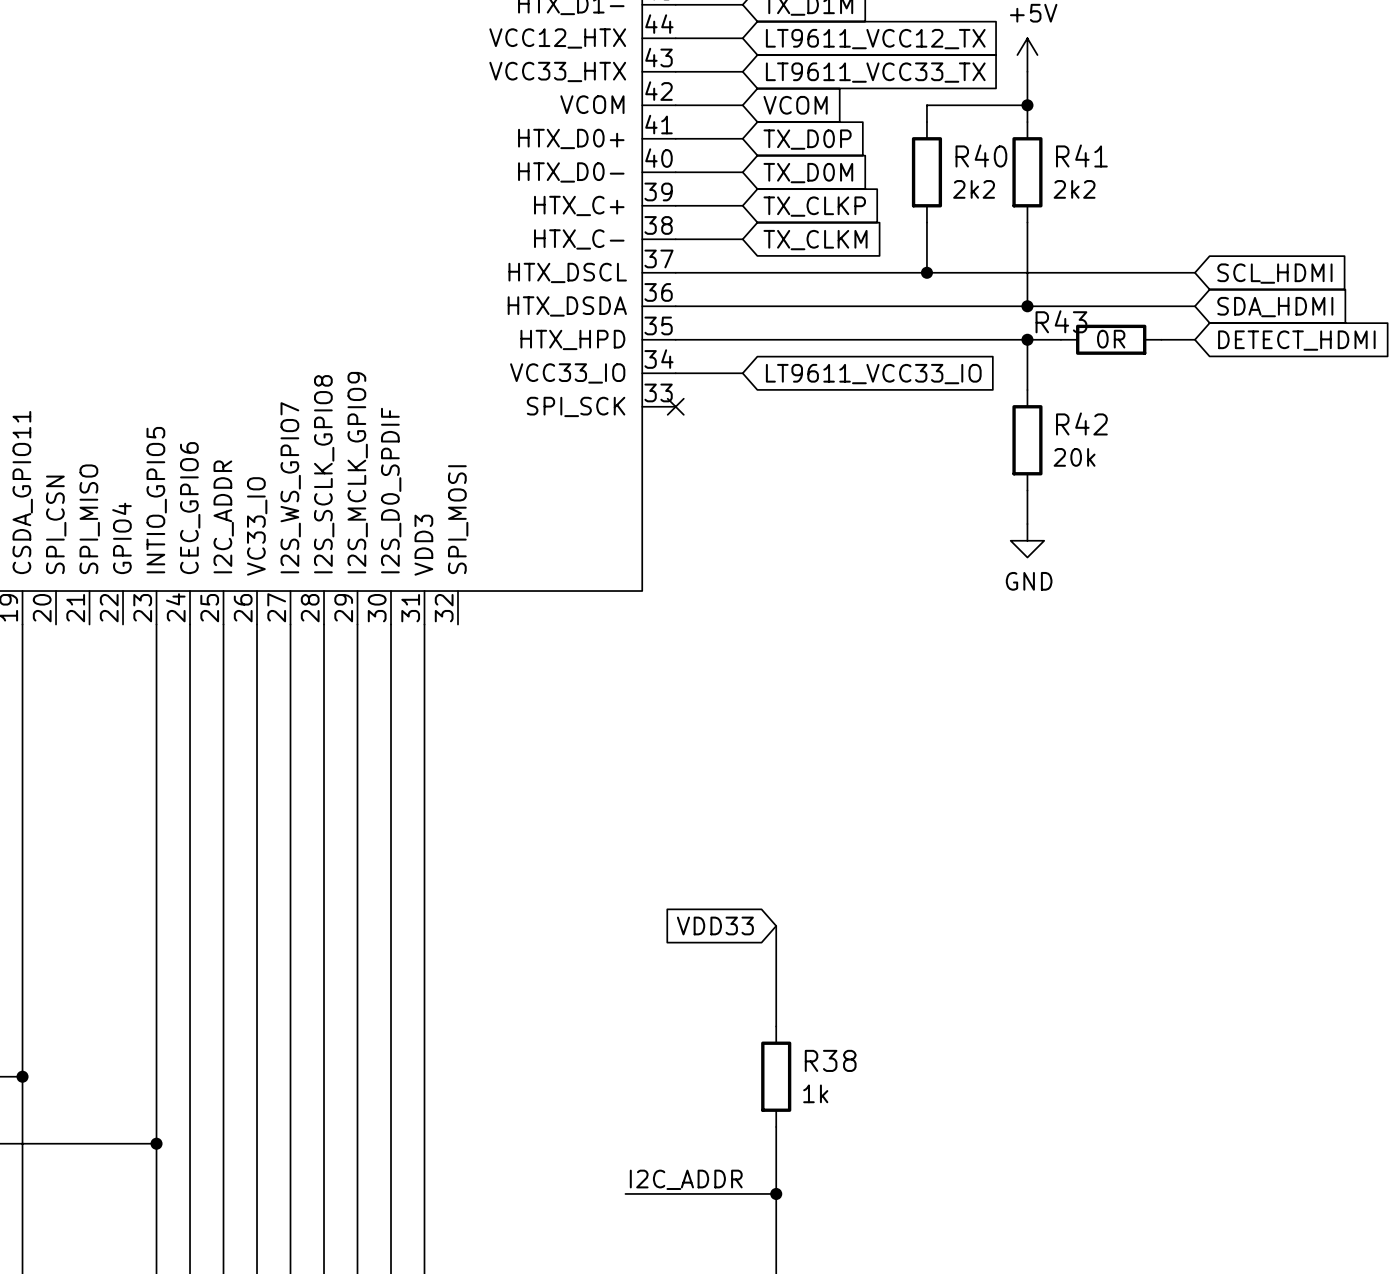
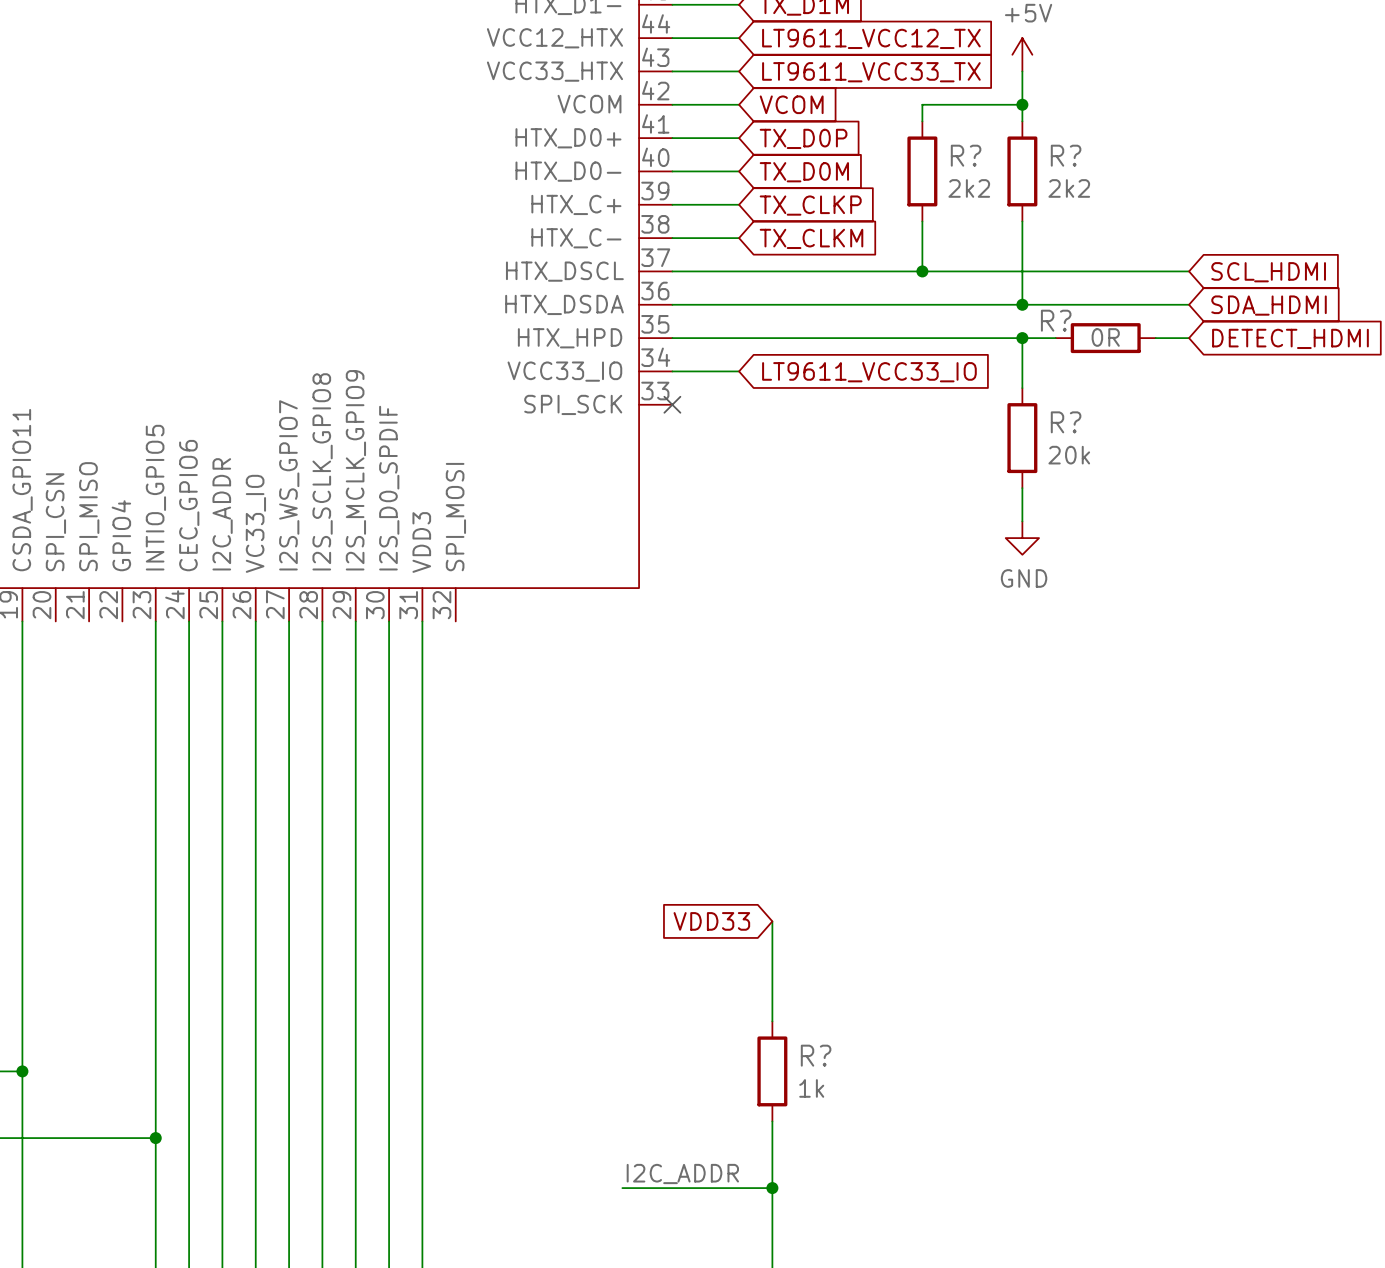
R40 name: R40 (981, 155) -> R? (966, 155)
R41 name: R41 (1081, 155) -> R? (1066, 155)
R43 name: R43 (1061, 321) -> R? (1056, 320)
R42 name: R42 (1081, 423) -> R? (1066, 422)
R38 name: R38 (830, 1060) -> R? (816, 1055)

